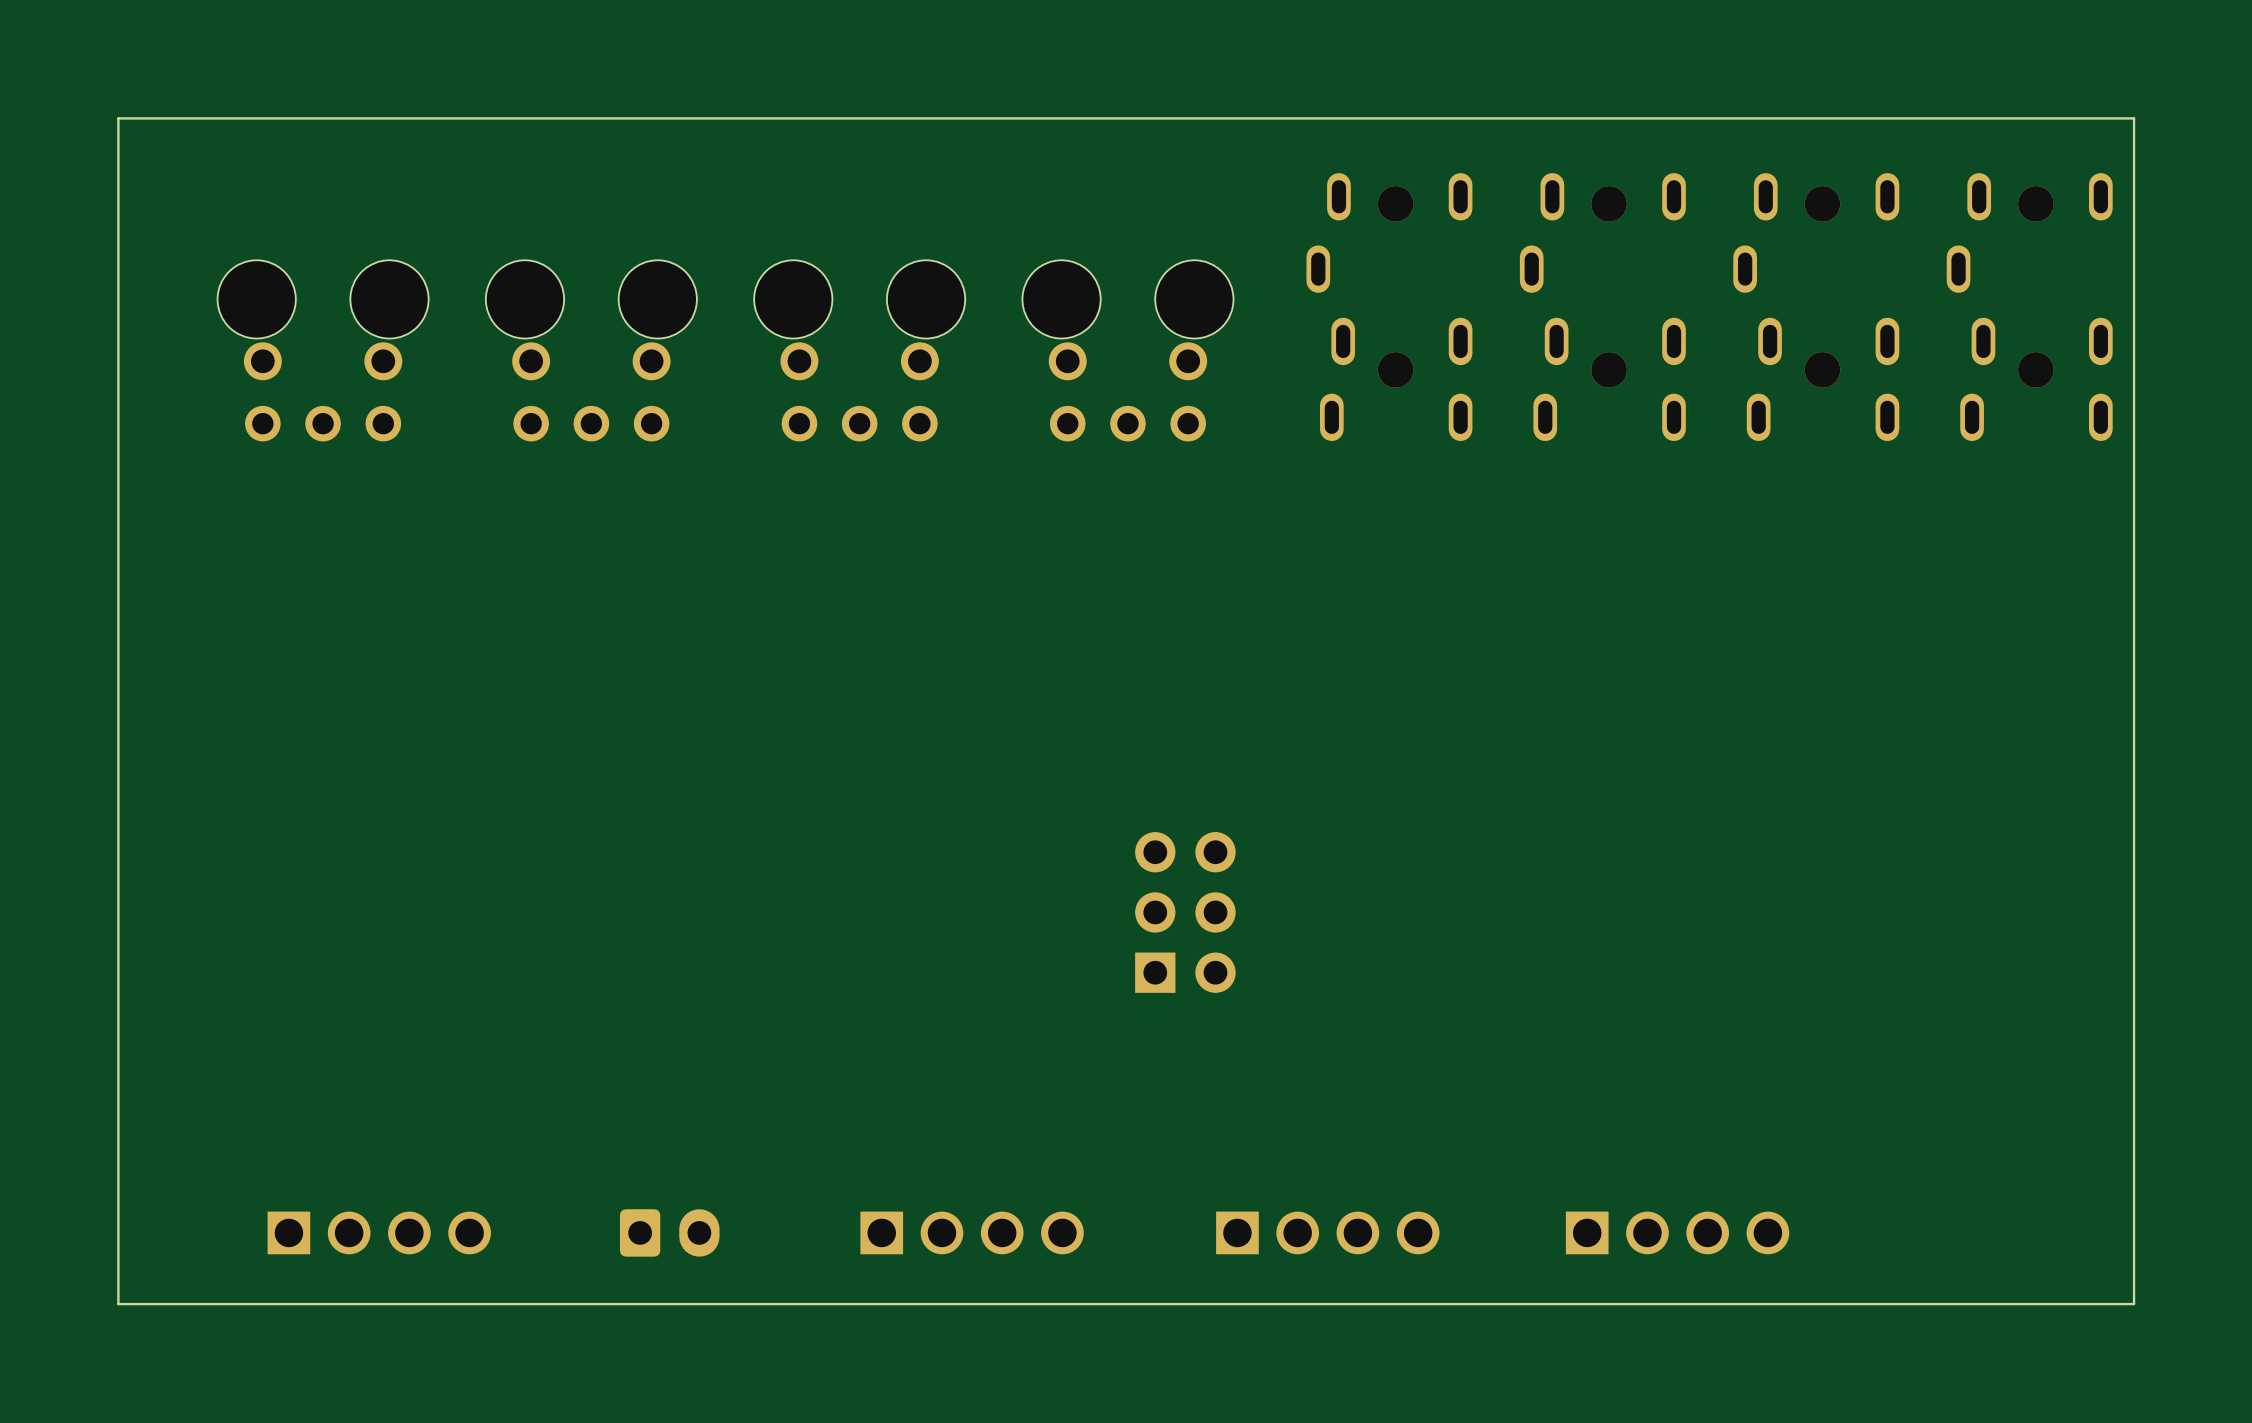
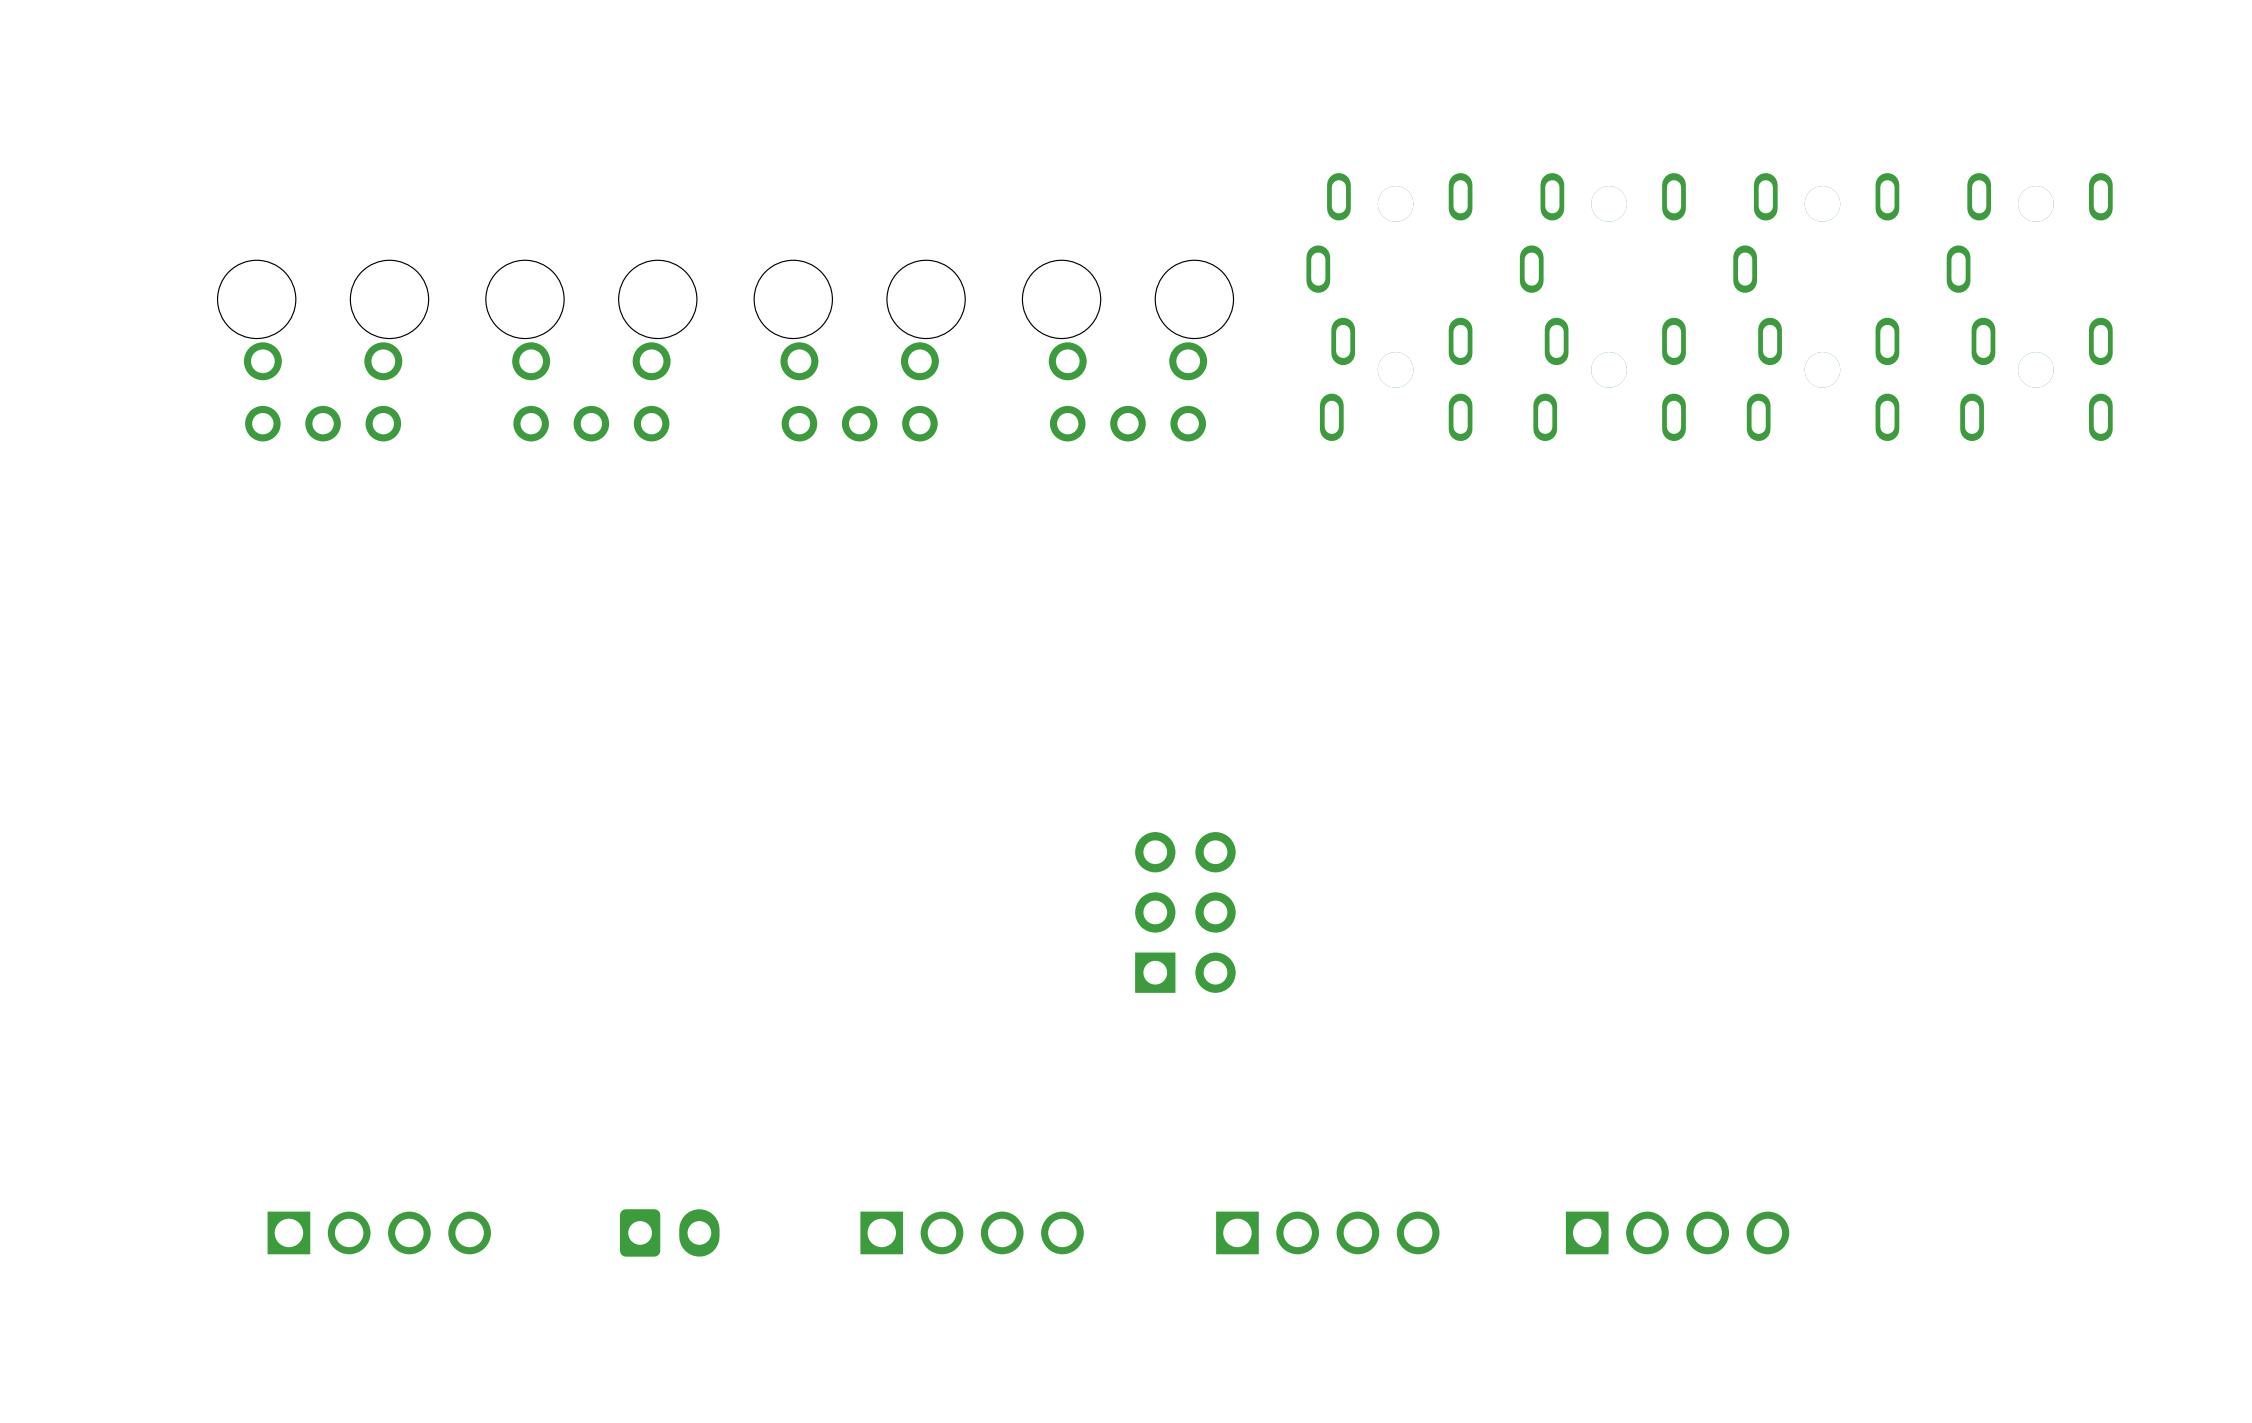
board edge: (2134, 118) (118, 118) (118, 1304) (2134, 1304) (2134, 118) -> none

